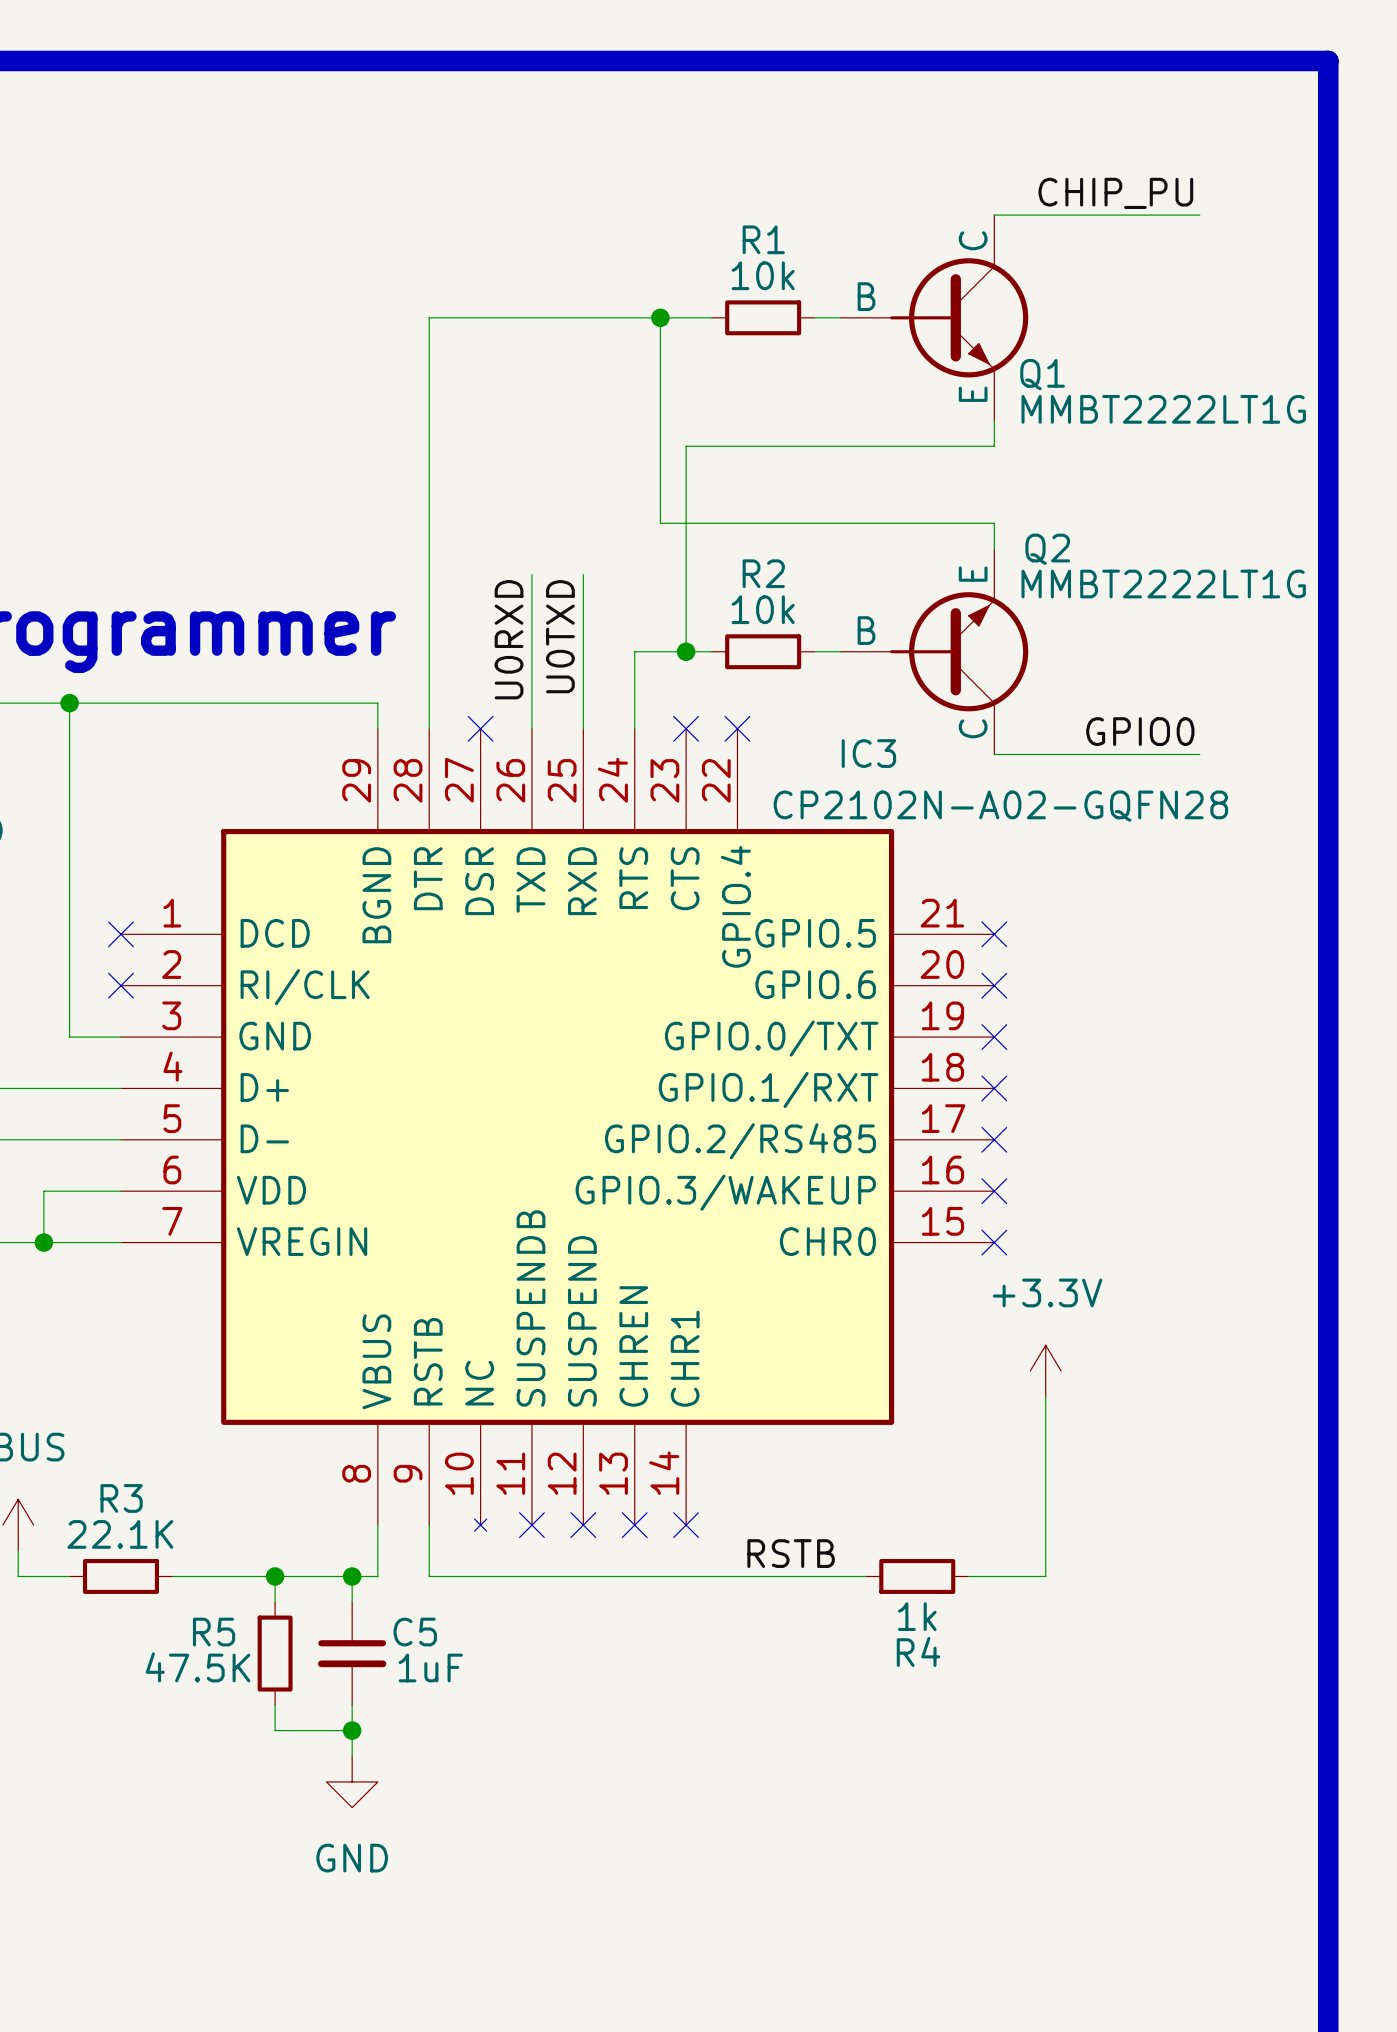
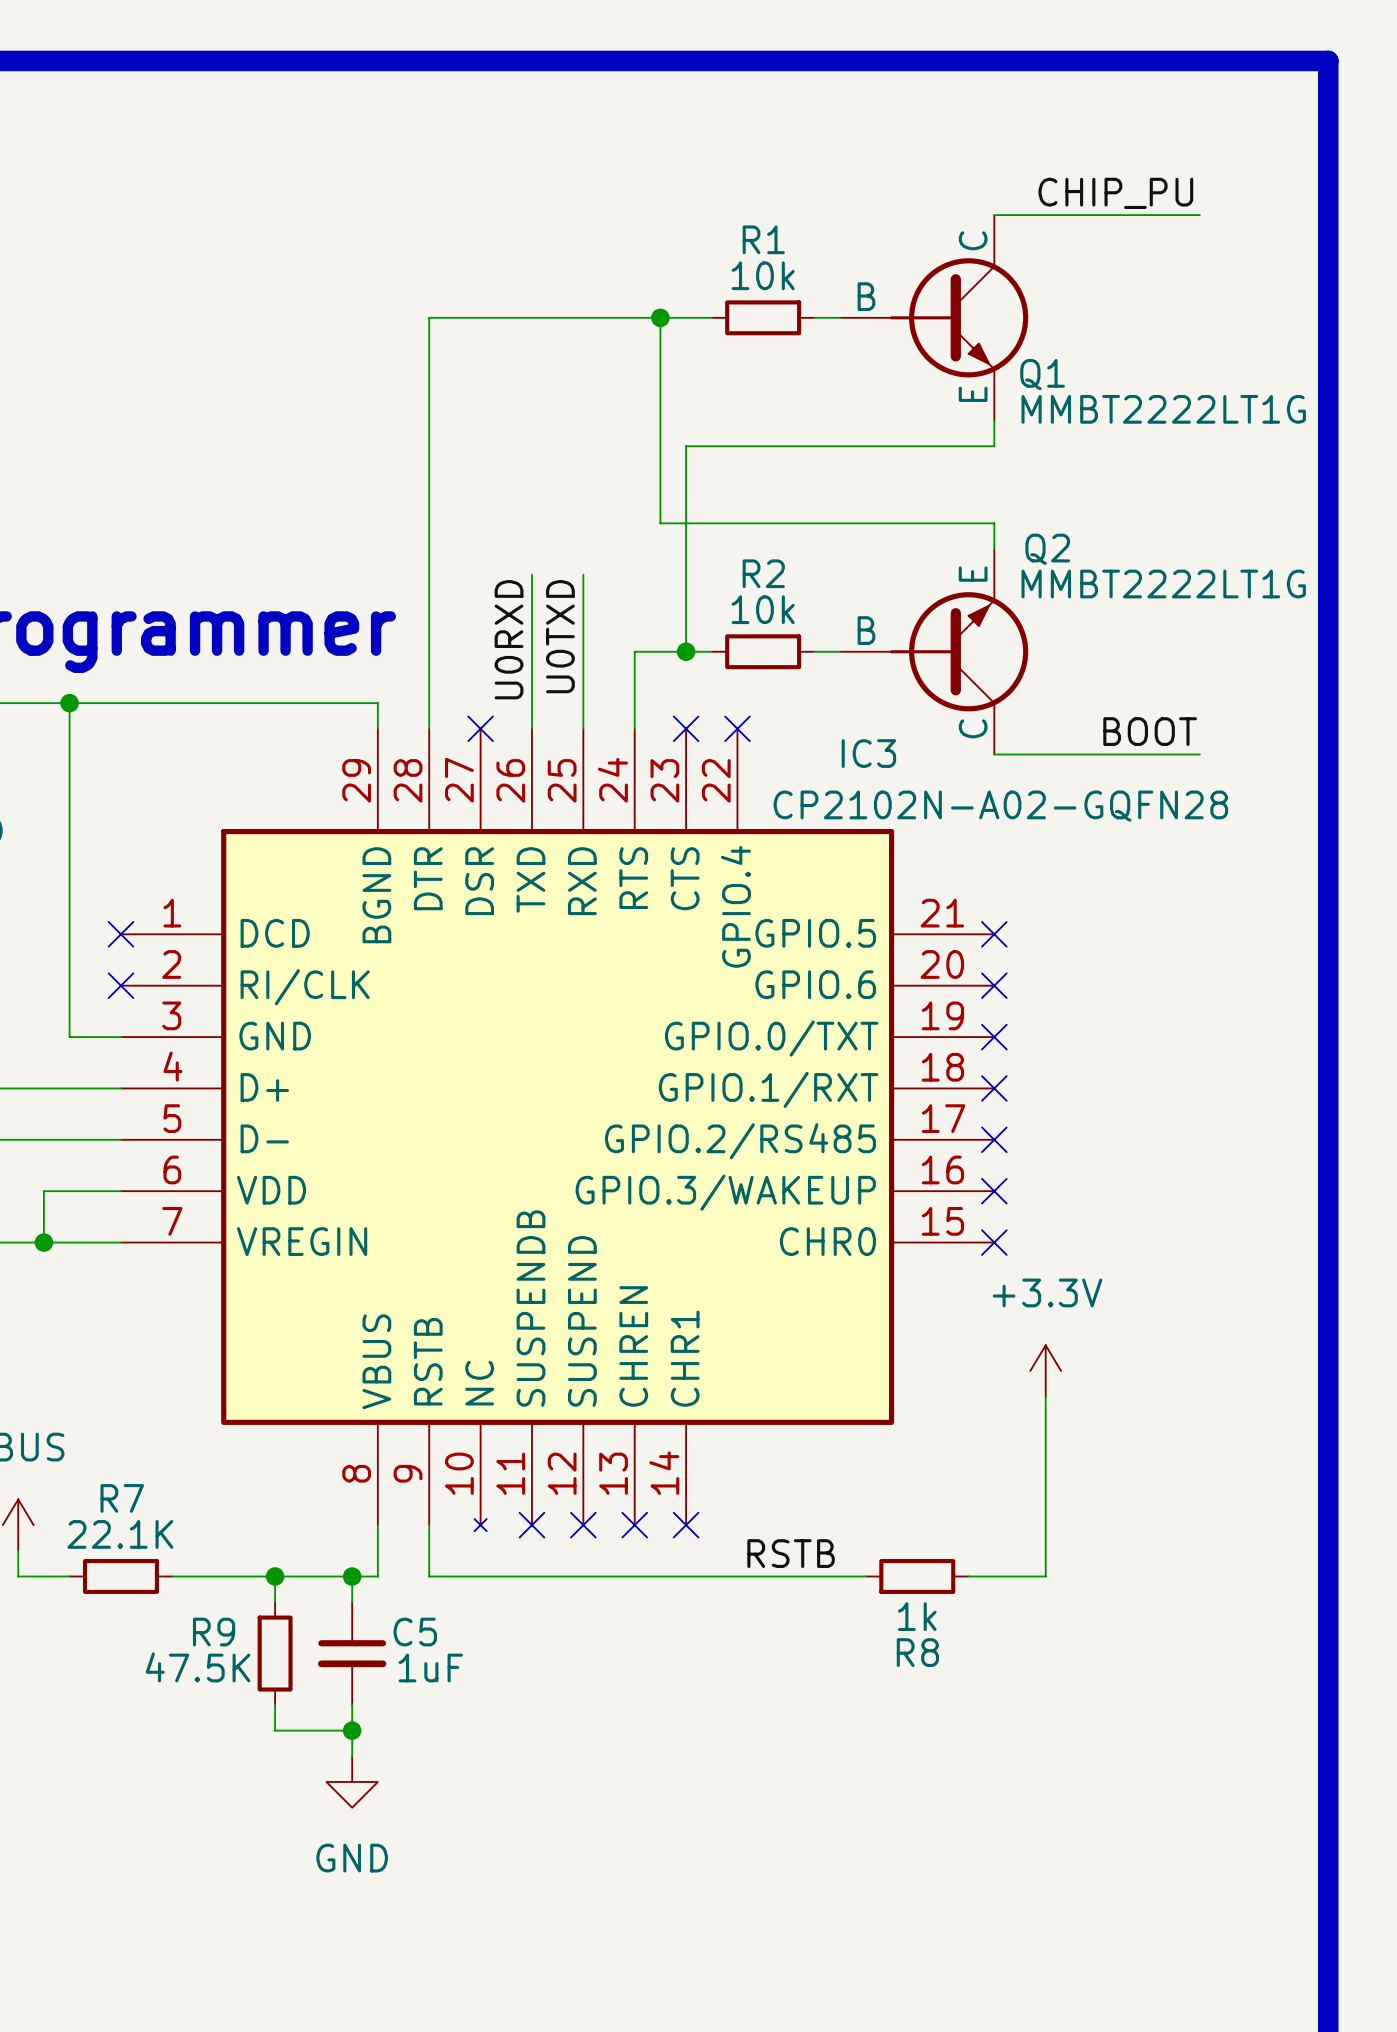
label: GPIO0 (1140, 731) -> BOOT (1150, 731)
R3 name: R3 (121, 1498) -> R7 (122, 1498)
R5 name: R5 (214, 1632) -> R9 (214, 1632)
R4 name: R4 (918, 1651) -> R8 (917, 1652)

